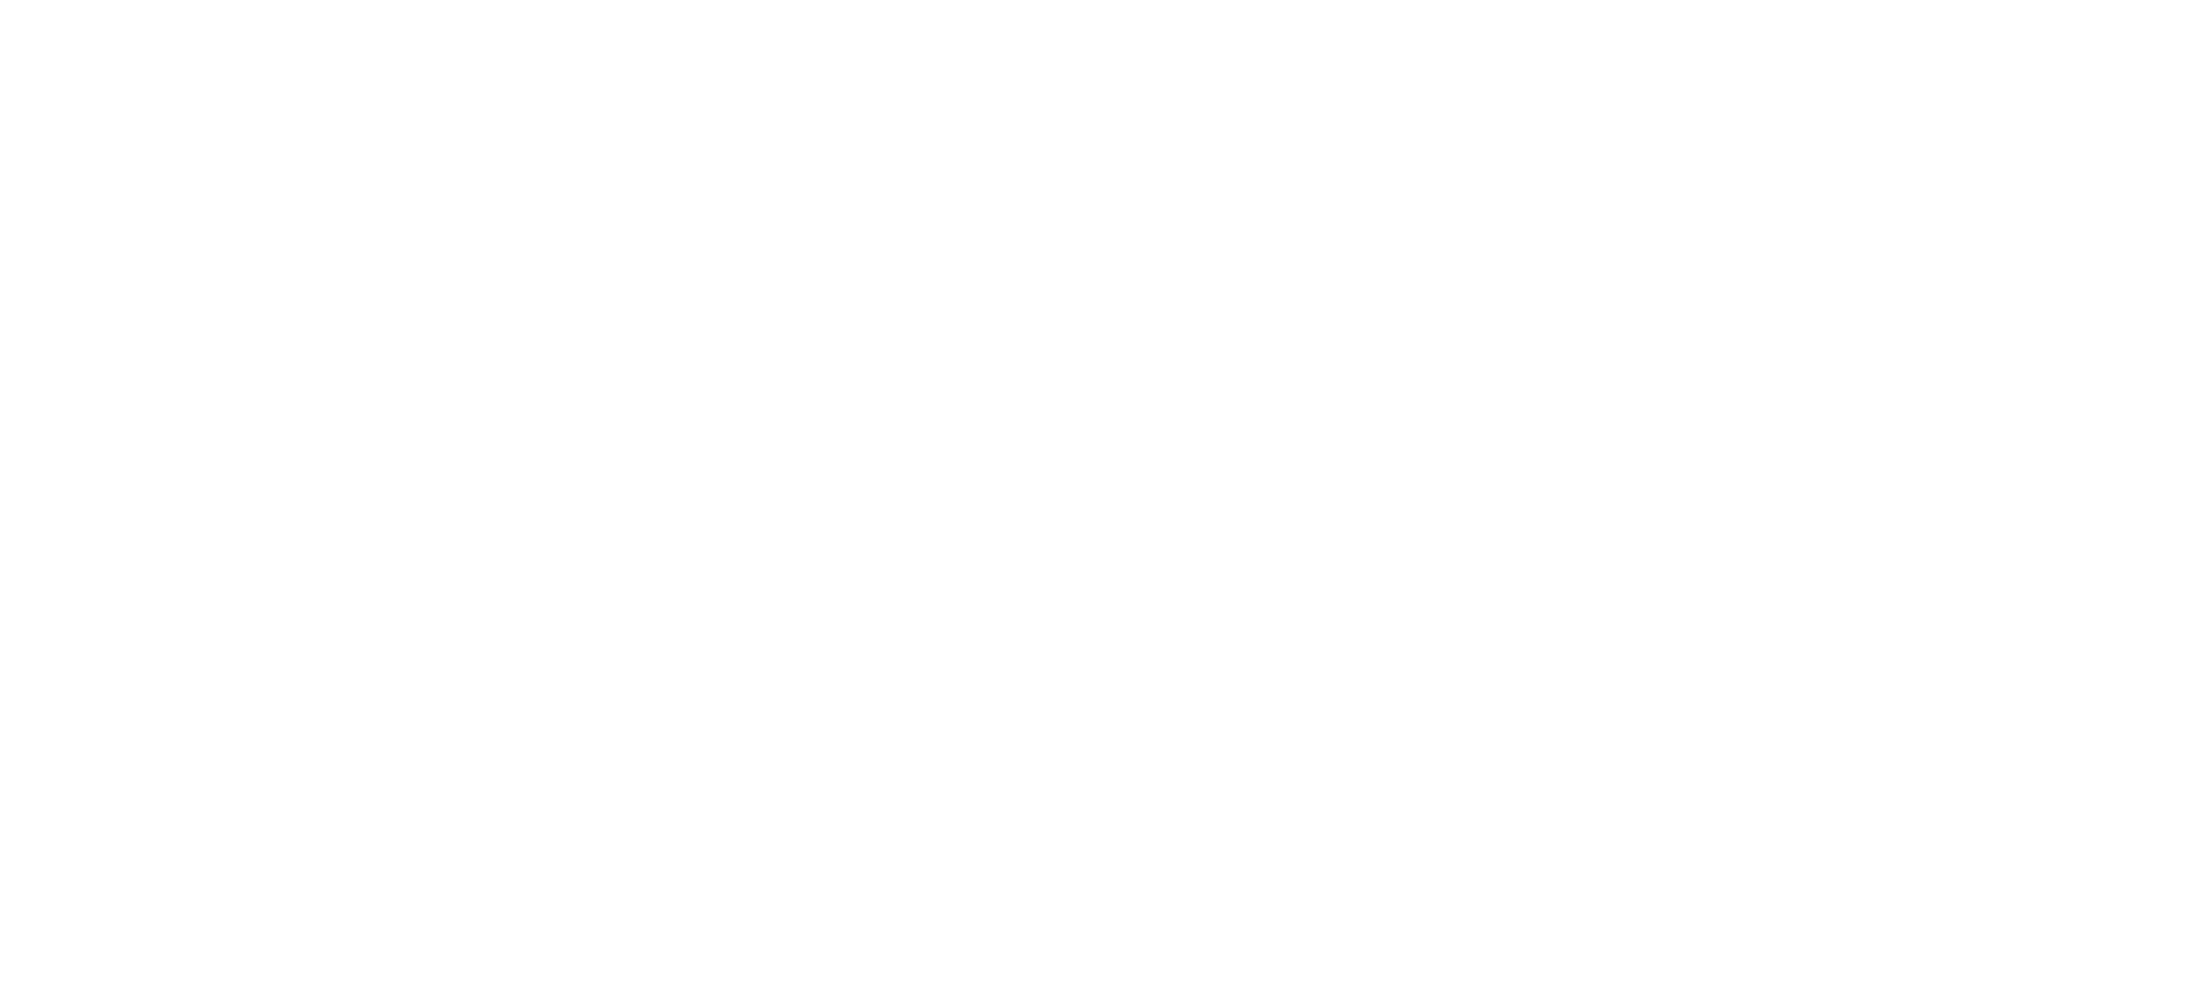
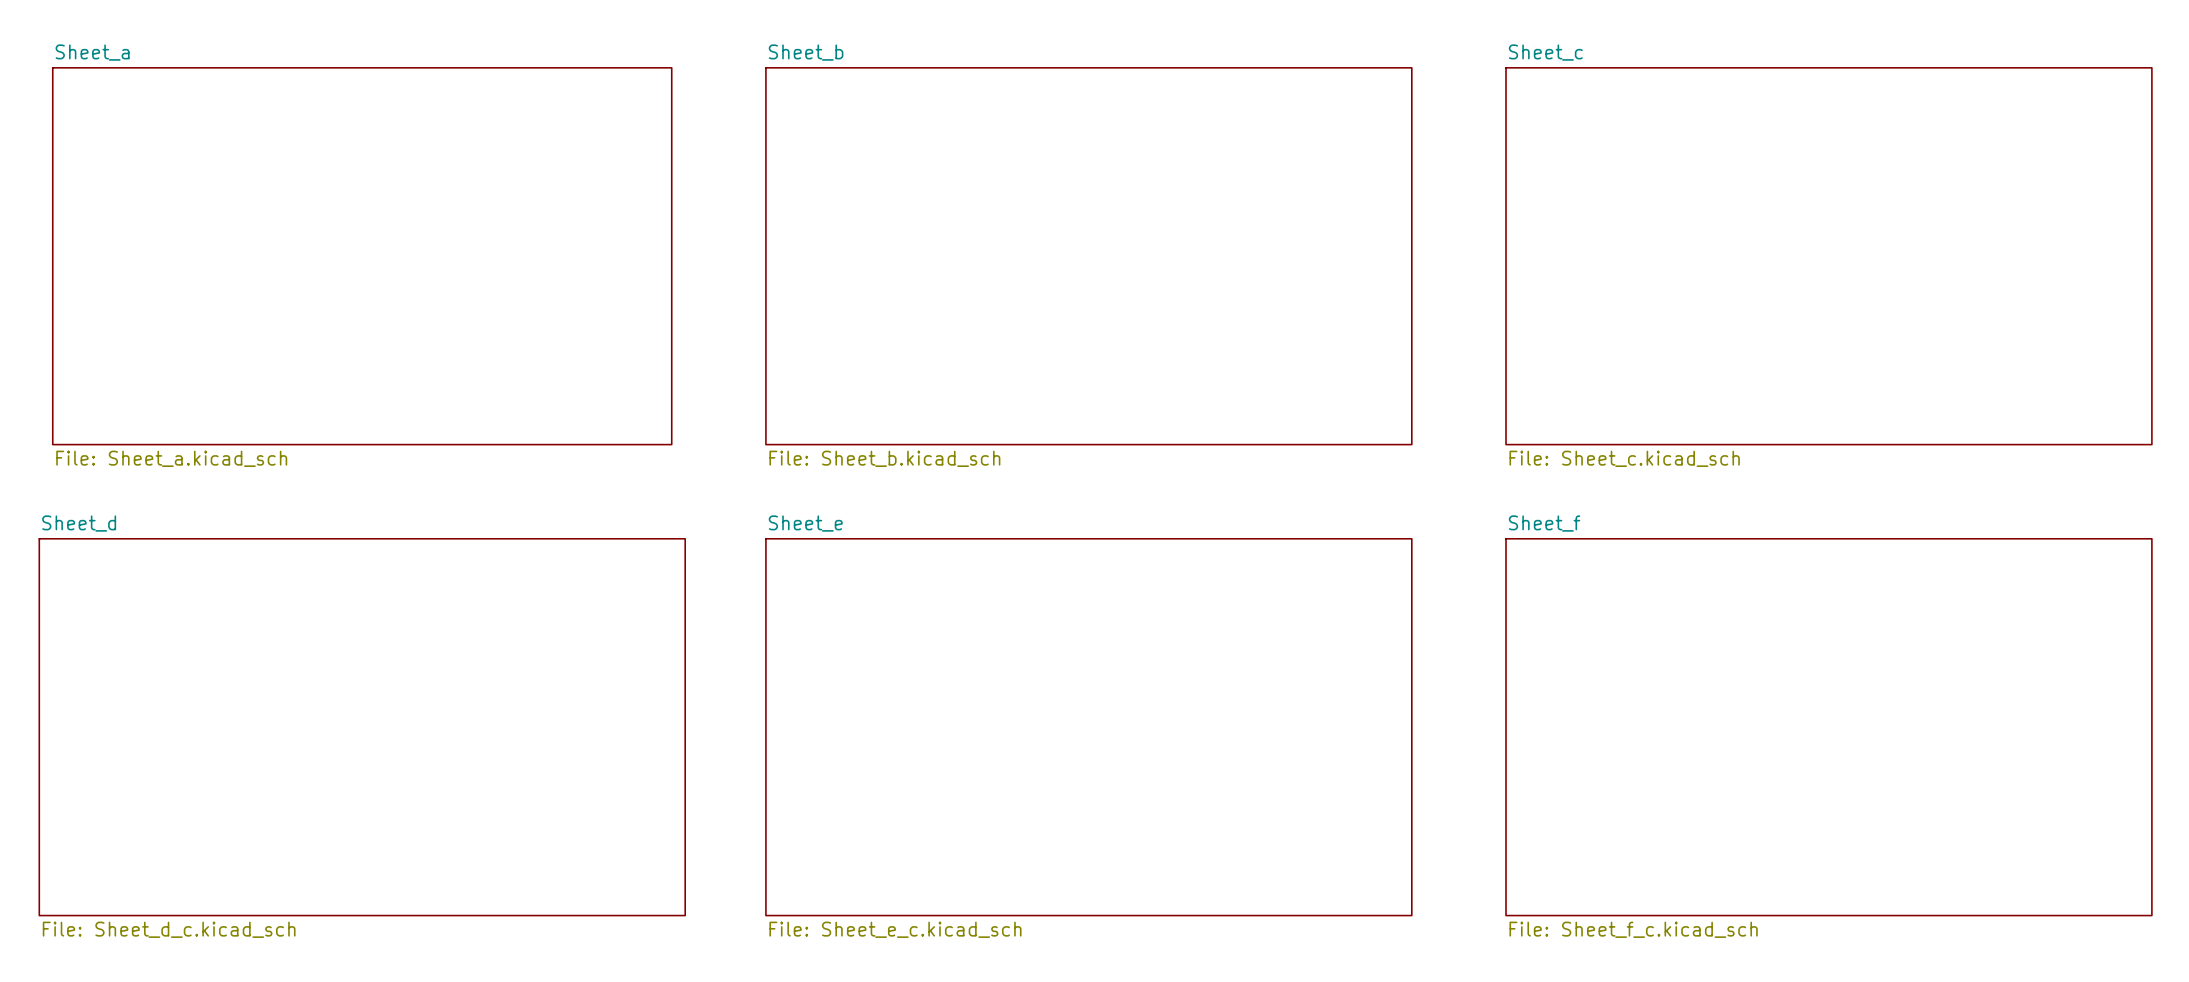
sheet Sheet_a: none -> File: Sheet_a.kicad_sch (362, 256)
sheet Sheet_b: none -> File: Sheet_b.kicad_sch (1088, 256)
sheet Sheet_c: none -> File: Sheet_c.kicad_sch (1828, 256)
sheet Sheet_d: none -> File: Sheet_d_c.kicad_sch (362, 727)
sheet Sheet_e: none -> File: Sheet_e_c.kicad_sch (1088, 727)
sheet Sheet_f: none -> File: Sheet_f_c.kicad_sch (1828, 727)

